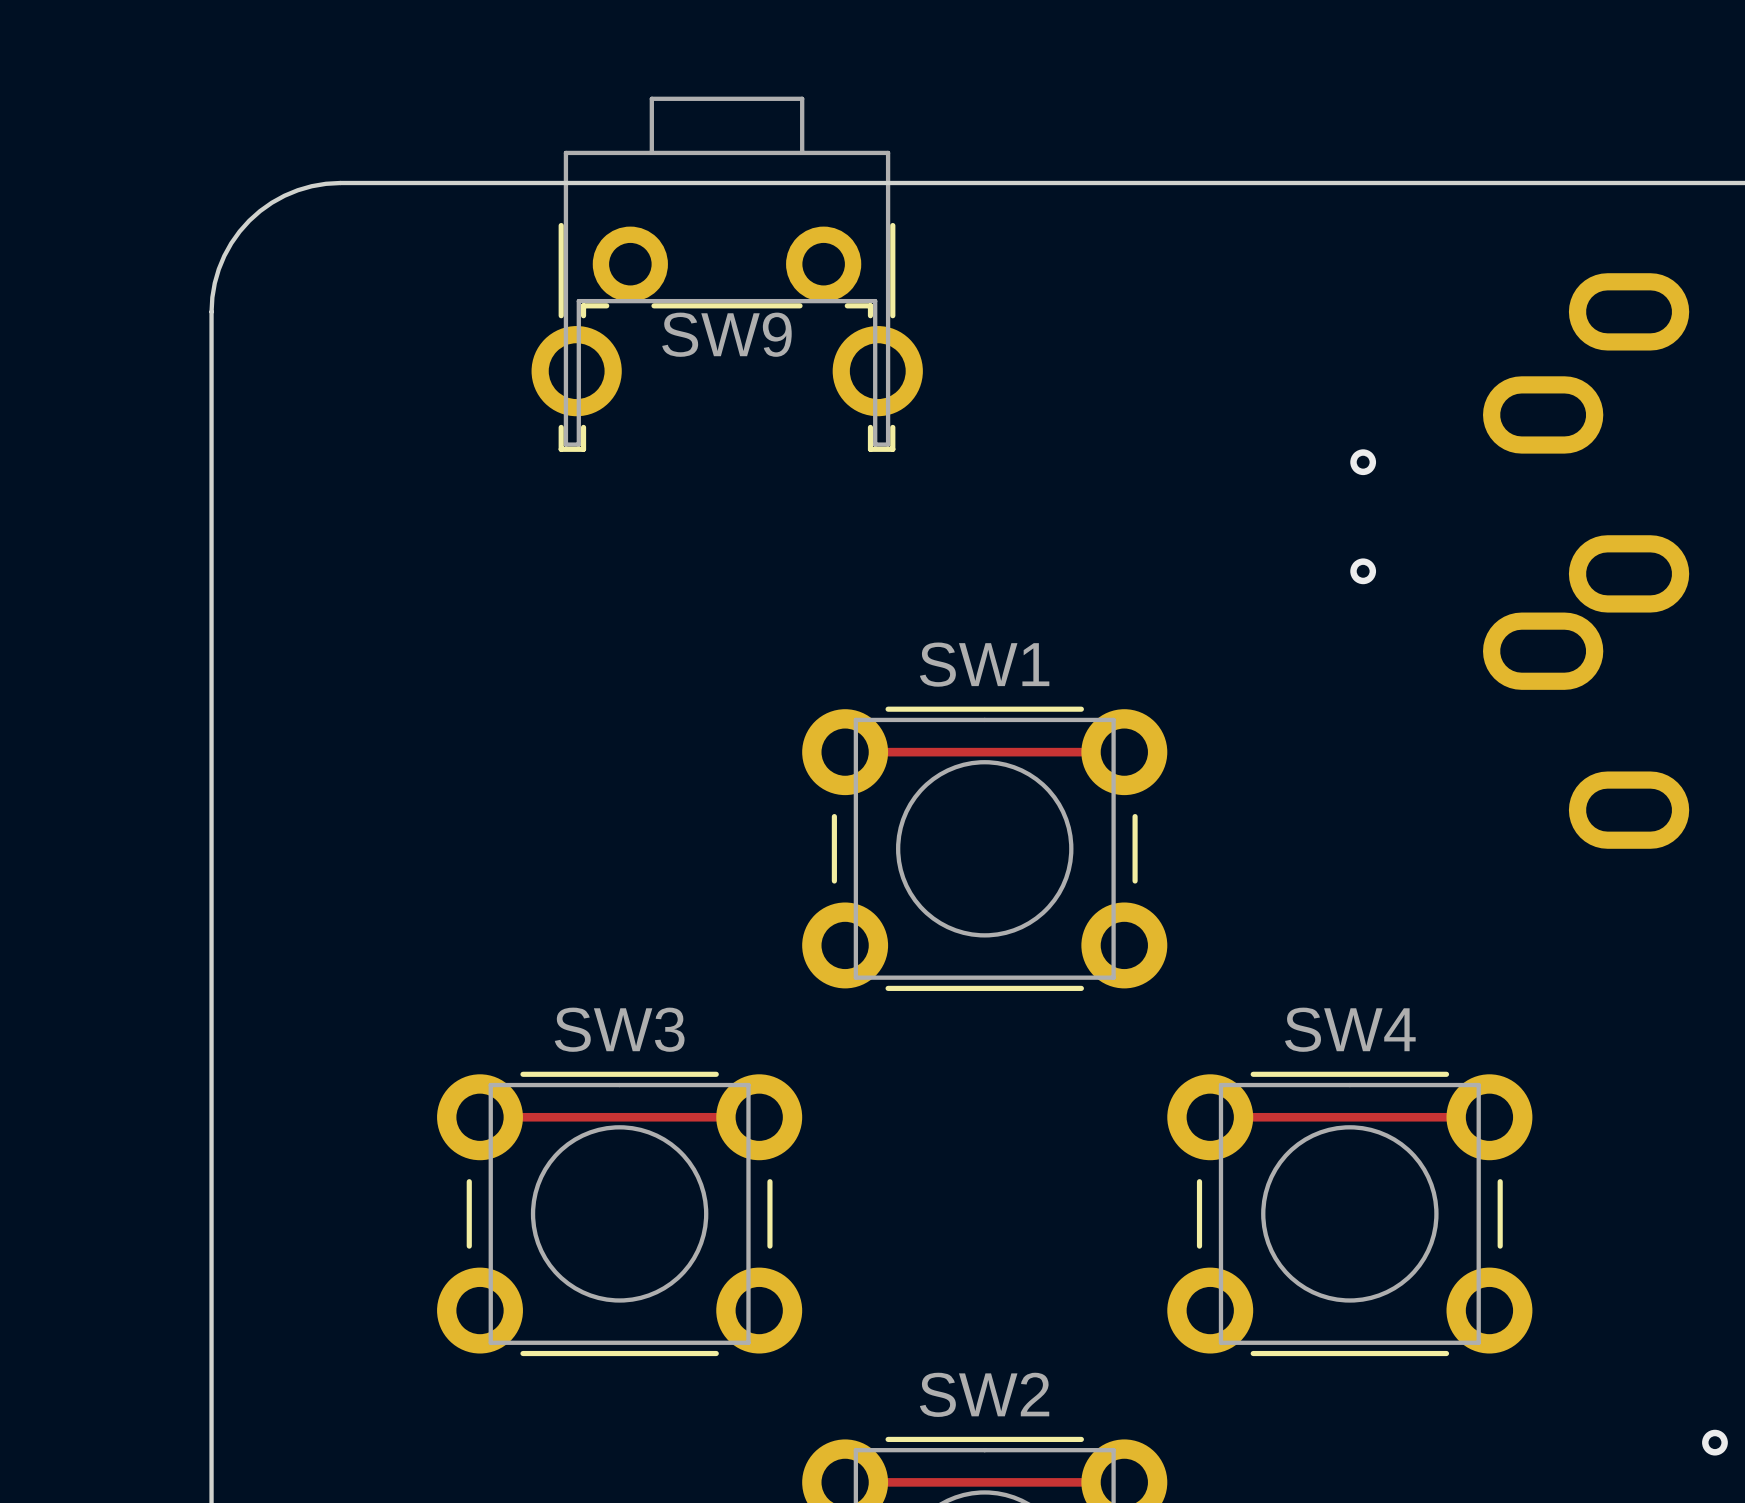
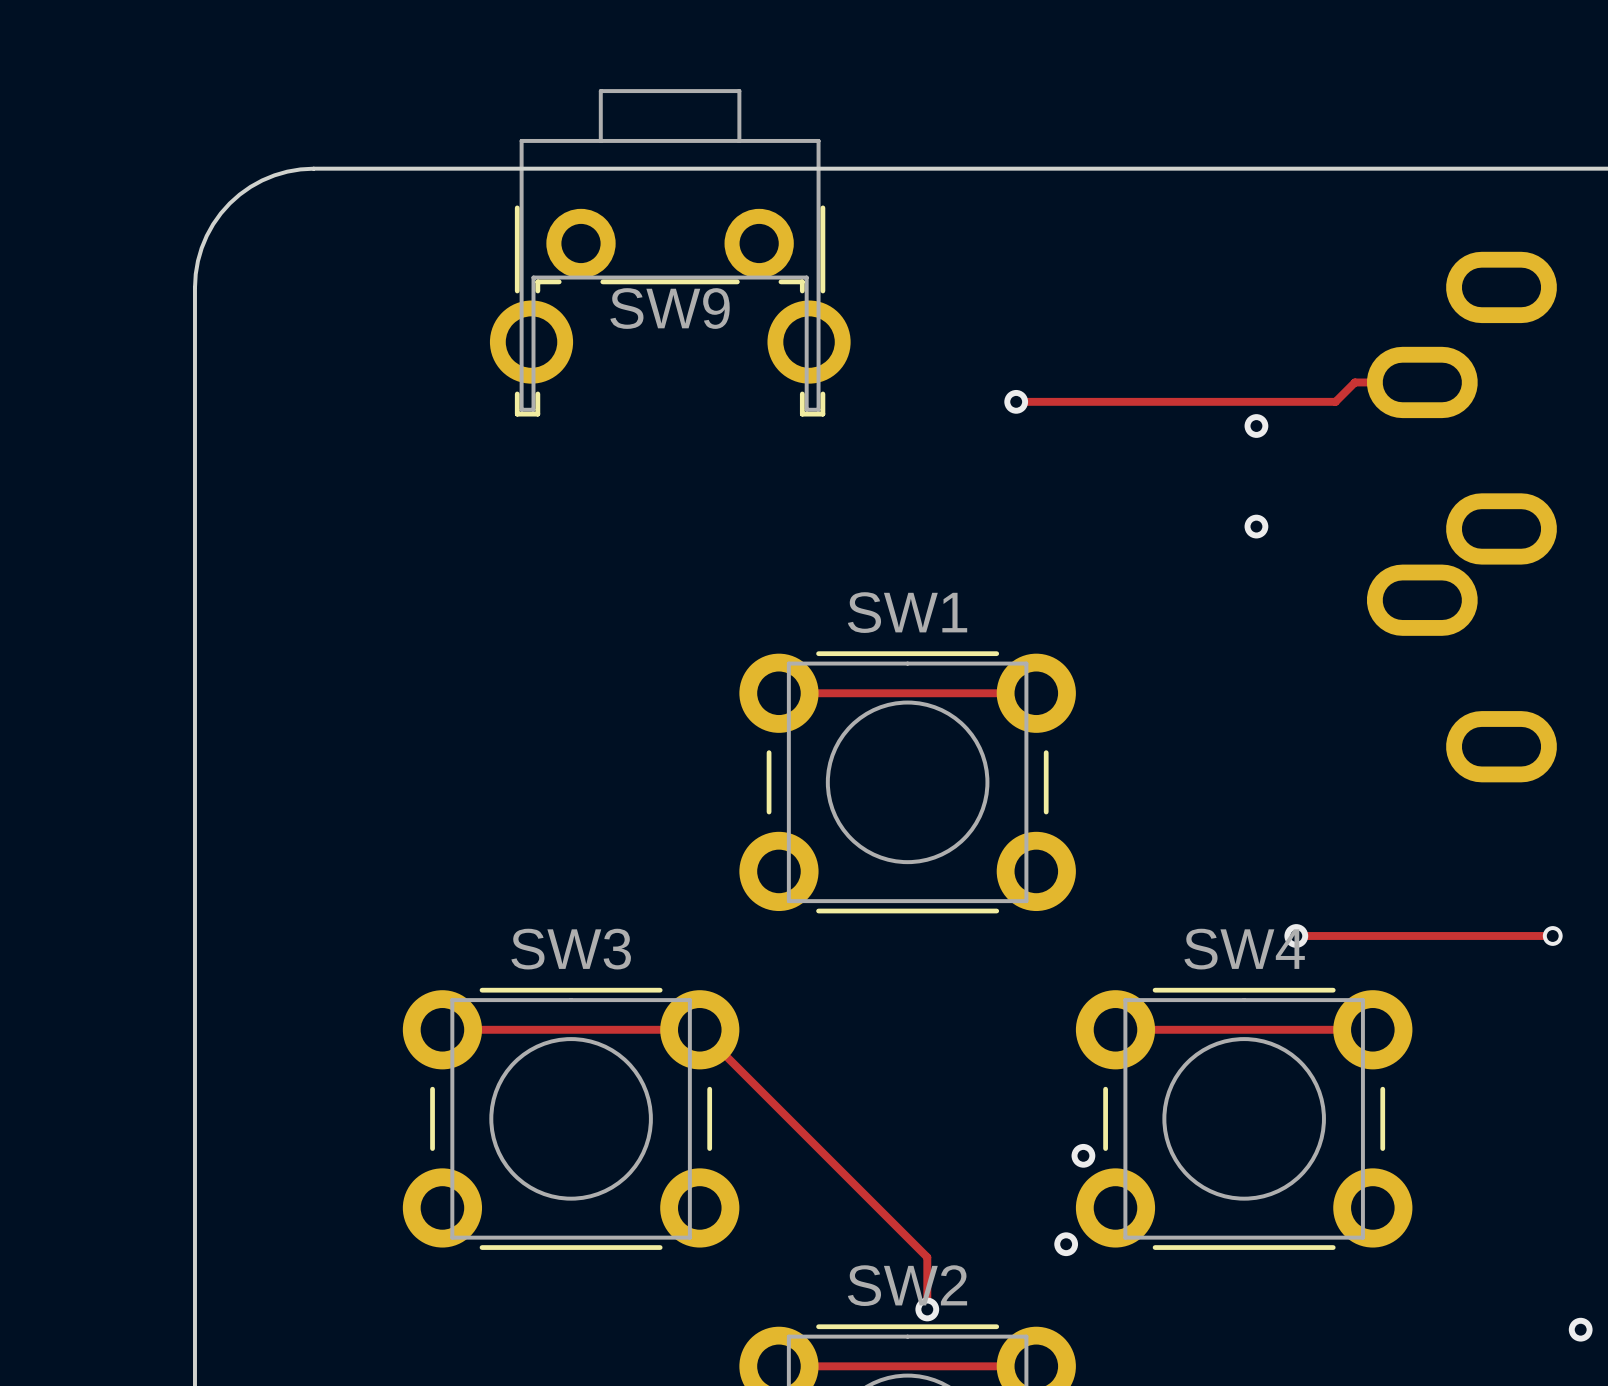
track: none -> (1422, 382) (1354, 382) (1335, 401) (1016, 401)
via: none -> (1016, 401)
track: none -> (1296, 935) (1552, 935)
via: none -> (1296, 935)
via: none -> (1552, 935)
track: none -> (699, 1029) (927, 1257) (927, 1309)
via: none -> (1083, 1155)
via: none -> (1066, 1244)
via: none -> (927, 1309)

